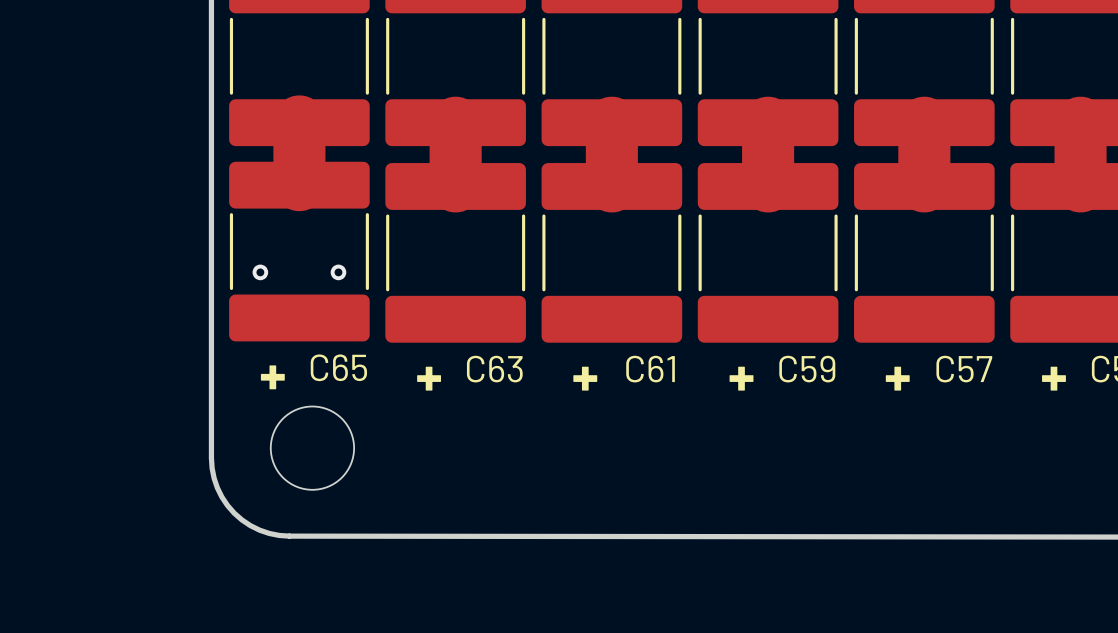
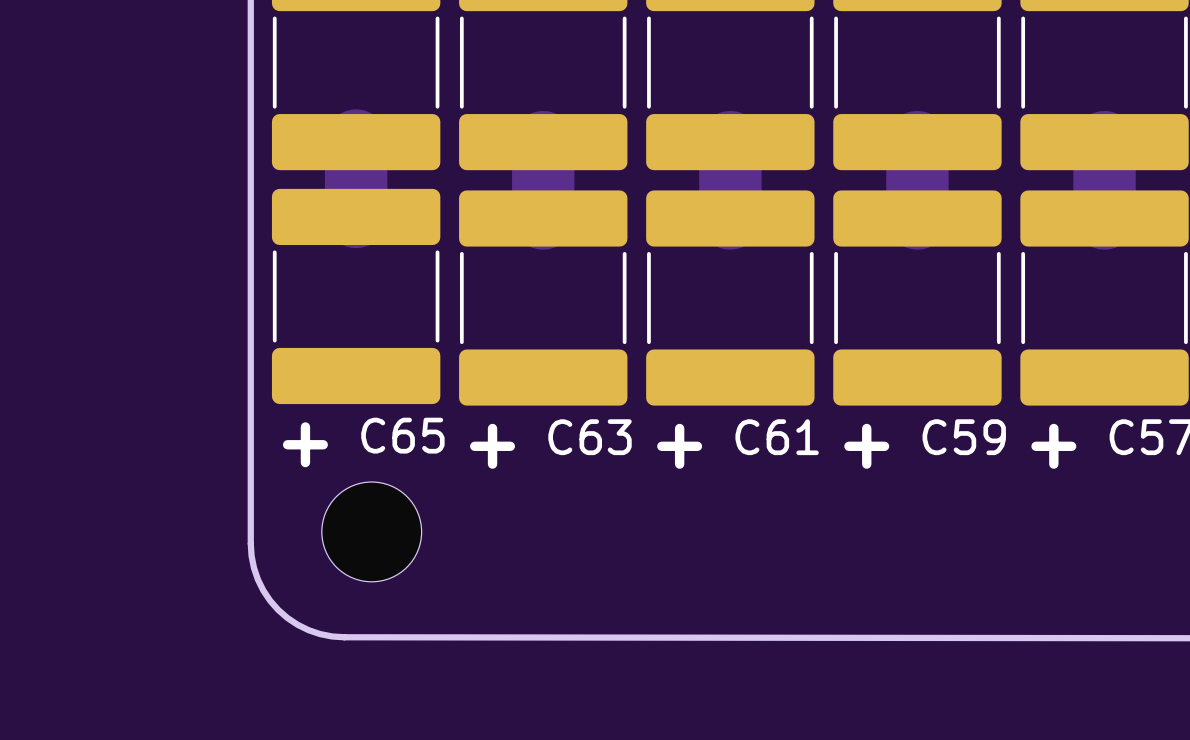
via: (260, 272) -> none
via: (338, 272) -> none

